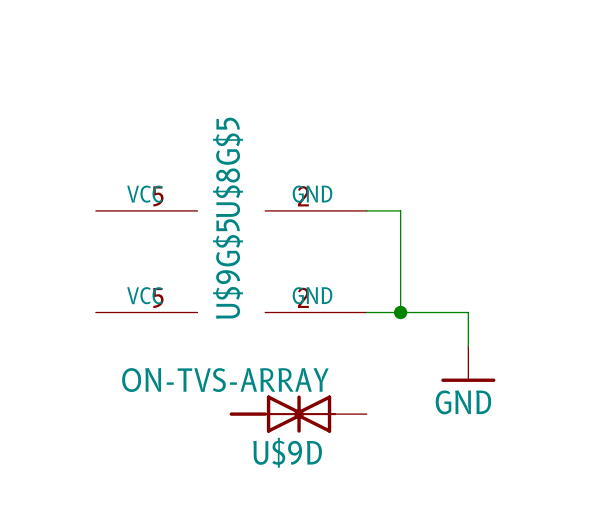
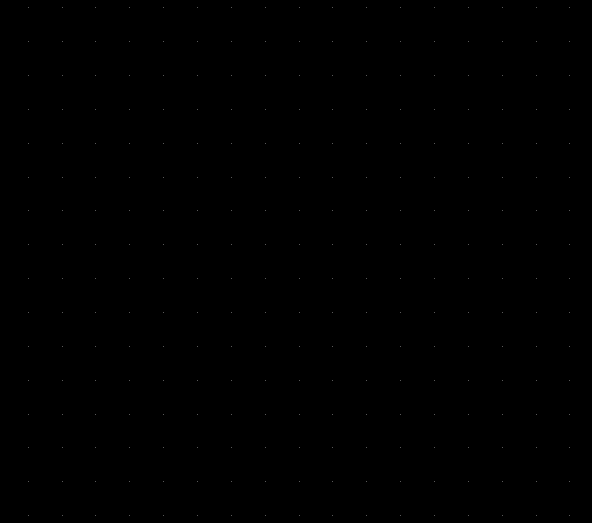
U$8G$5: (231, 210) -> none
wire: (366, 210) (400, 210) (400, 312) -> none
U$9G$5: (231, 312) -> none
wire: (366, 312) (468, 312) (468, 346) -> none
junction: (400, 312) -> none
power symbol: GND (468, 364) -> none
U$9D: ON-TVS-ARRAY (298, 414) -> none

